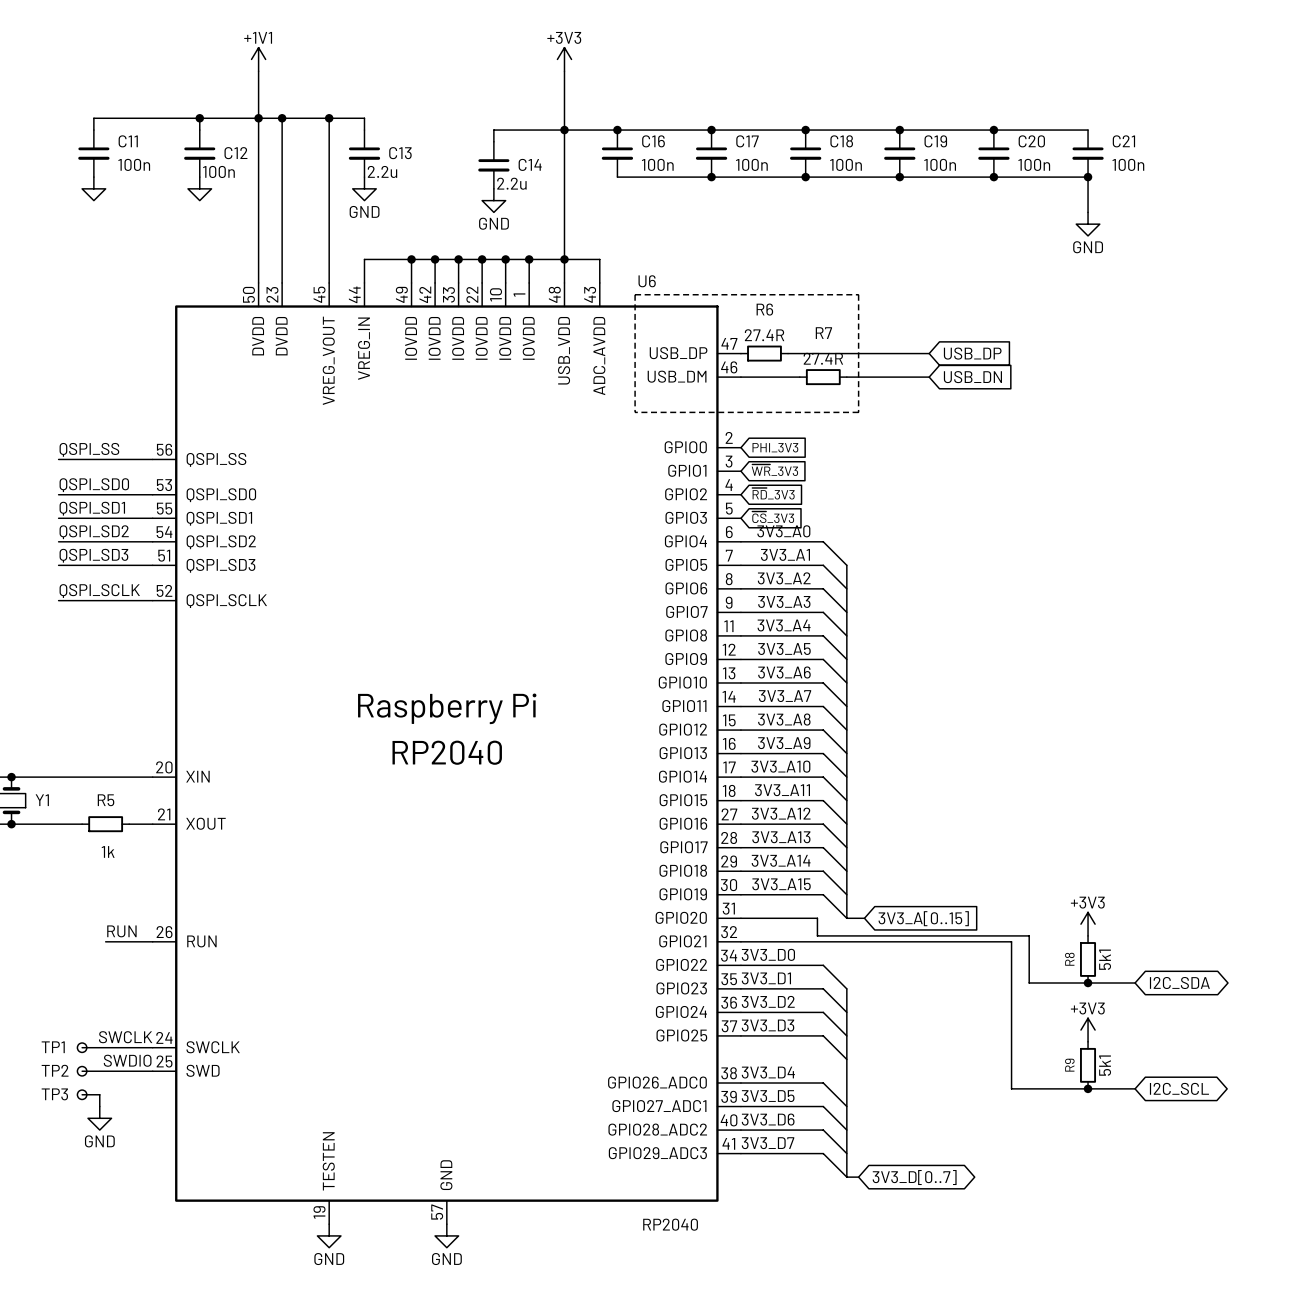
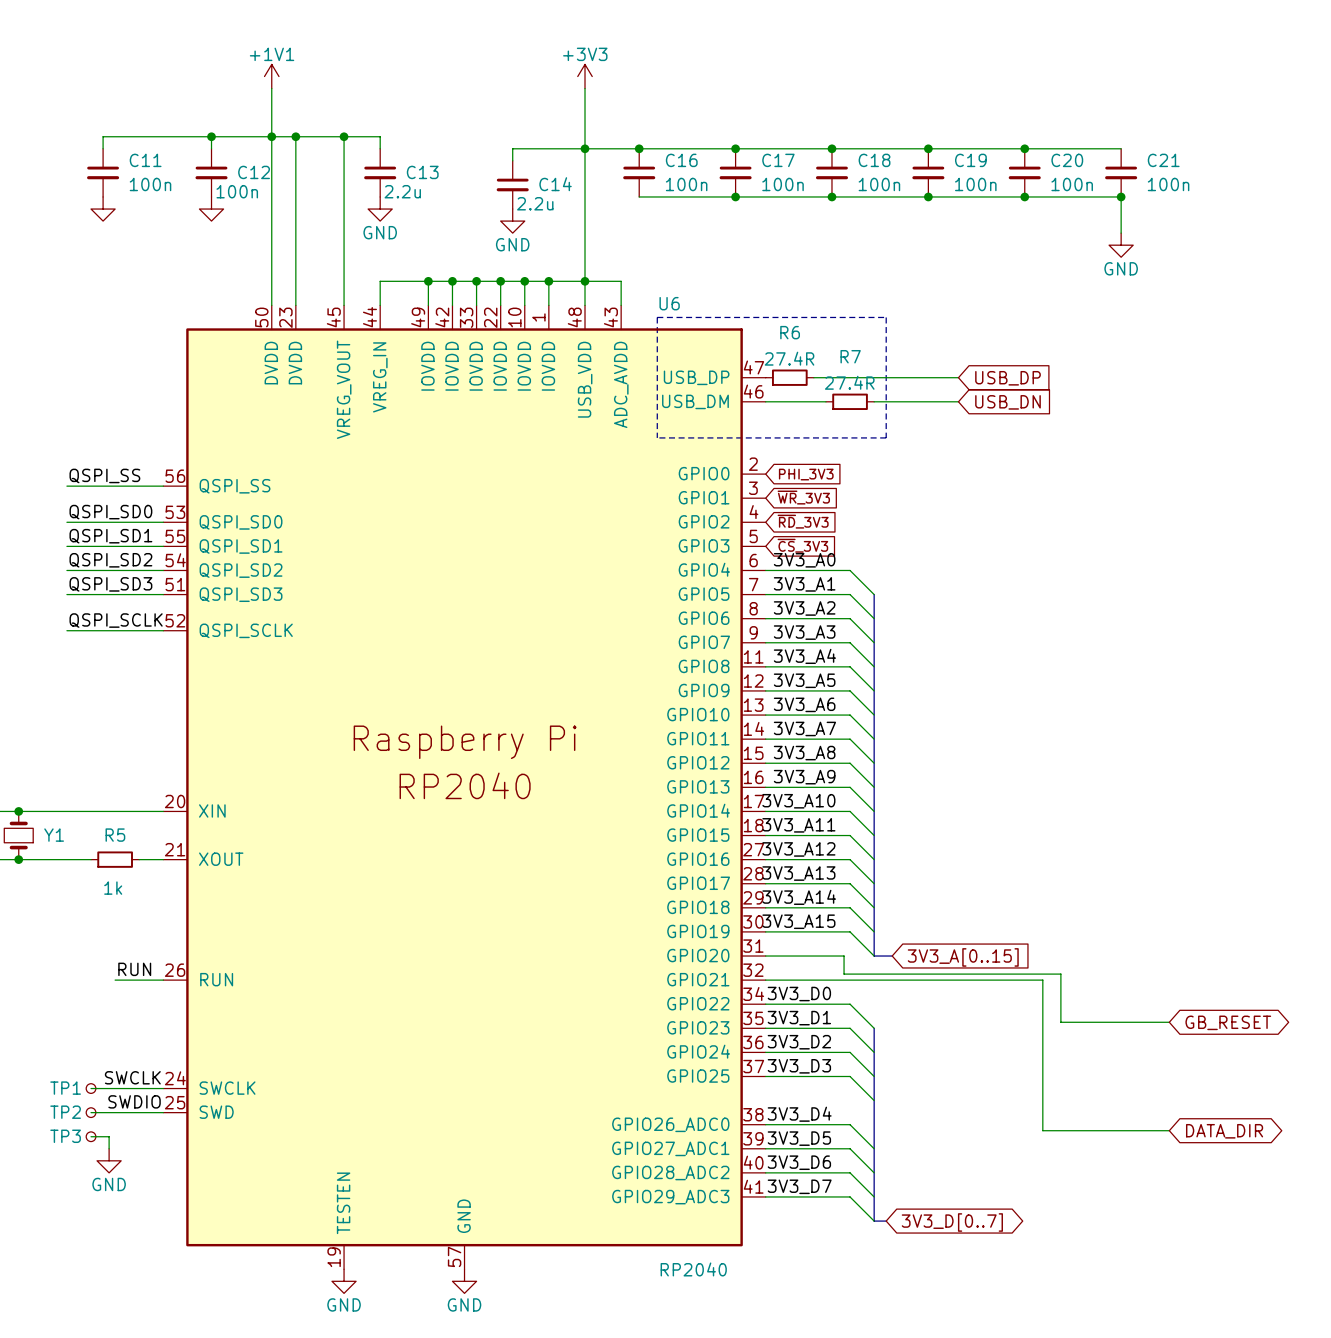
power symbol: +3V3 (1088, 924) -> none
R8: 5k1 (1088, 959) -> none
junction: (1088, 983) -> none
global label: I2C_SDA (1179, 983) -> GB_RESET (1228, 1022)
power symbol: +3V3 (1088, 1030) -> none
R9: 5k1 (1088, 1065) -> none
junction: (1088, 1088) -> none
global label: I2C_SCL (1179, 1088) -> DATA_DIR (1224, 1131)

